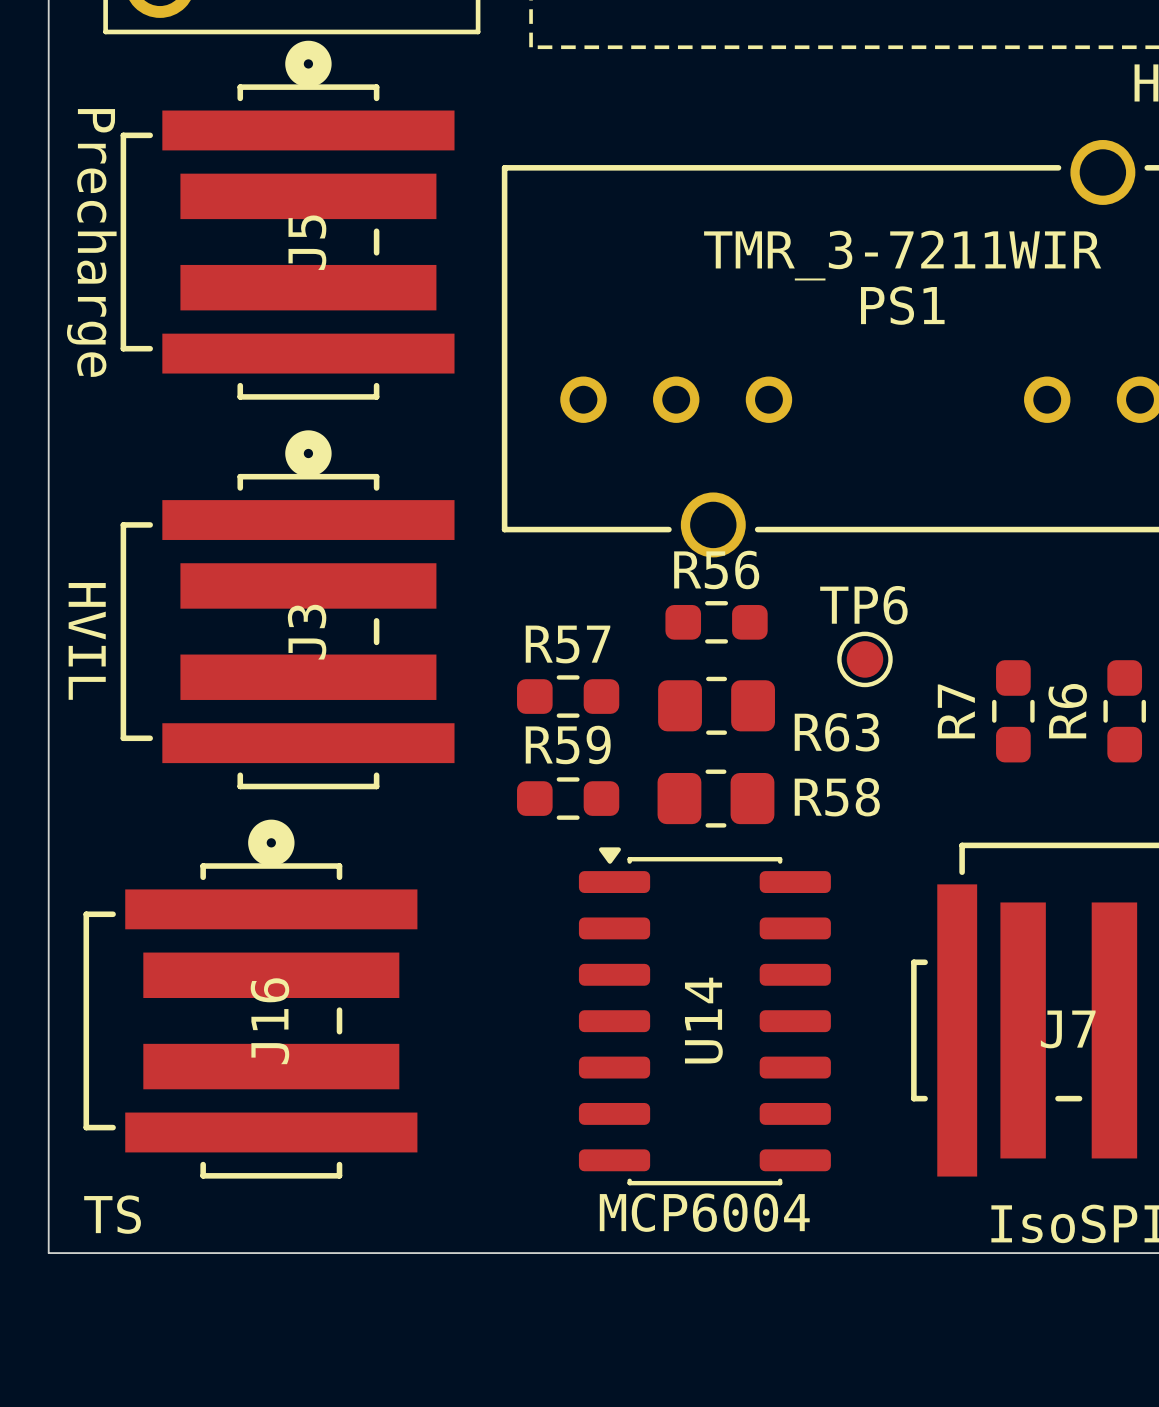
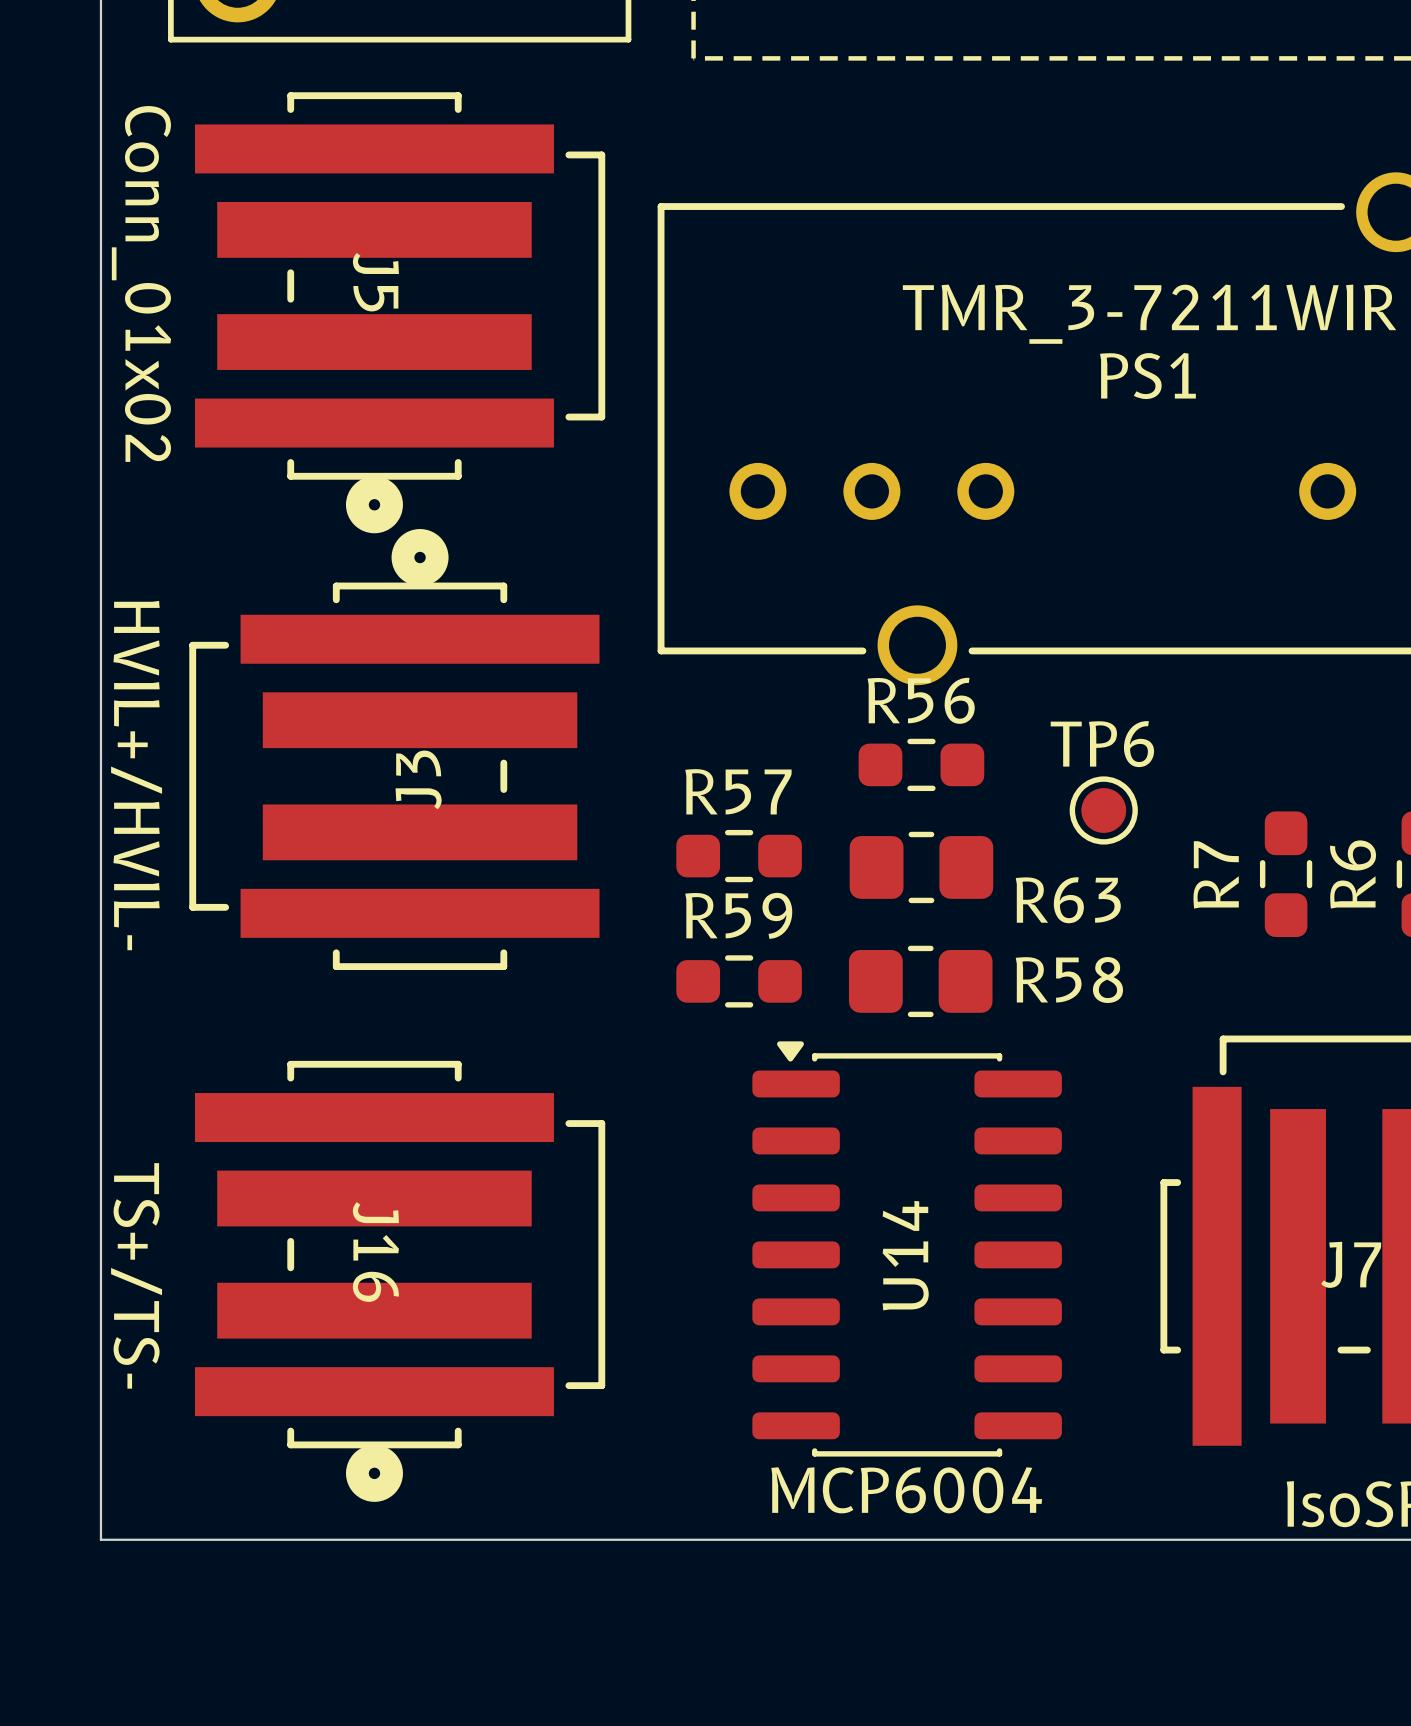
J5 rotation: 0° (287, 220) -> 180° (400, 312)
J5 value: Precharge (91, 242) -> Conn_01x02 (141, 283)
J3 value: HVIL (87, 641) -> HVIL+/HVIL- (136, 775)
J16 rotation: 0° (250, 999) -> 180° (400, 1281)
J16 value: TS (112, 1214) -> TS+/TS- (136, 1275)

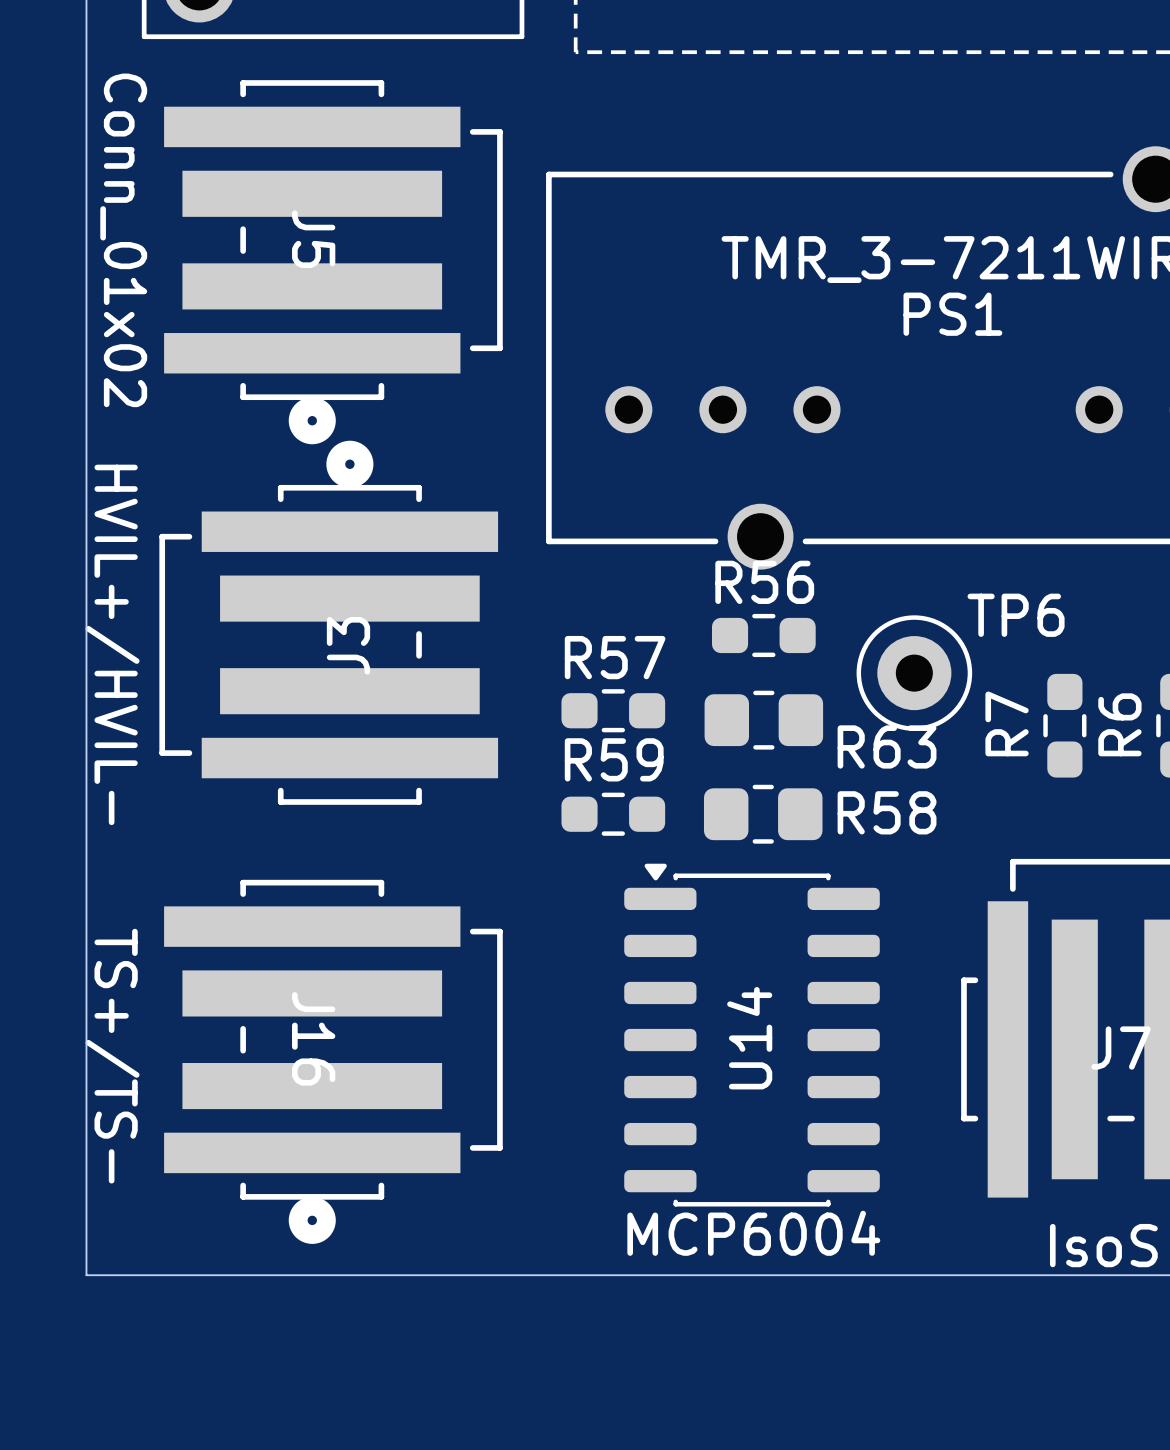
TP6 name position: TP6 (1102, 744) -> TP6 (1016, 615)
TP6 footprint: [1069, 776, 1138, 845] -> [856, 615, 973, 731]

